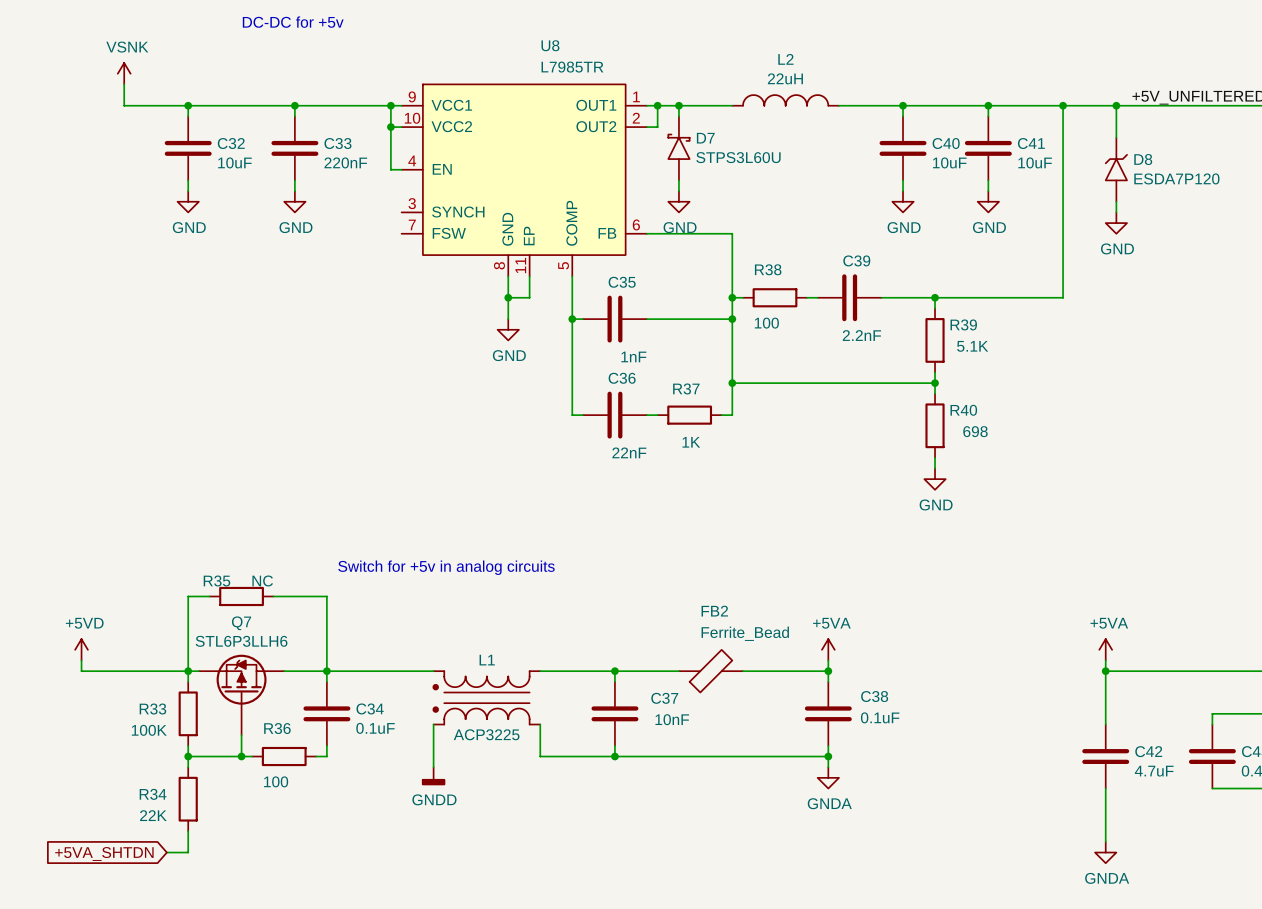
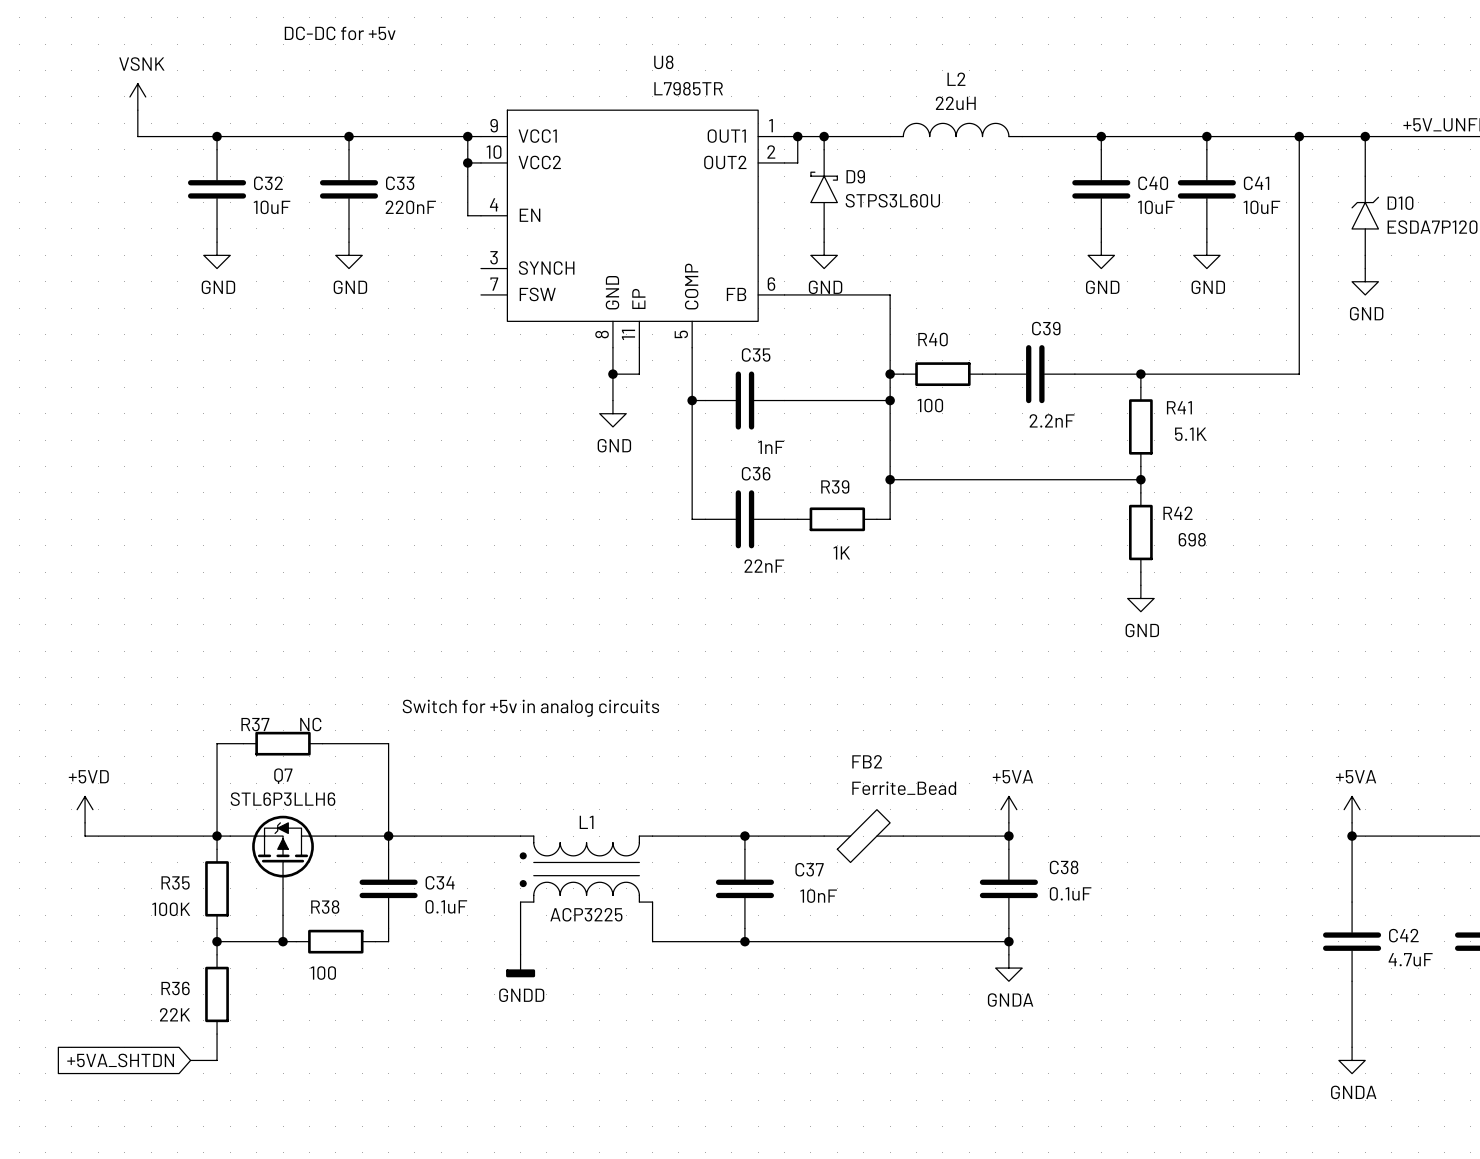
D7 name: D7 (705, 138) -> D9 (855, 176)
D8 name: D8 (1143, 159) -> D10 (1400, 203)
R38 name: R38 (768, 269) -> R40 (933, 339)
R39 name: R39 (963, 324) -> R41 (1179, 407)
R37 name: R37 (686, 388) -> R39 (835, 486)
R40 name: R40 (963, 410) -> R42 (1178, 513)
R35 name: R35 (216, 580) -> R37 (255, 724)
R33 name: R33 (152, 709) -> R35 (175, 882)
R36 name: R36 (277, 728) -> R38 (325, 907)
R34 name: R34 (153, 794) -> R36 (175, 988)

